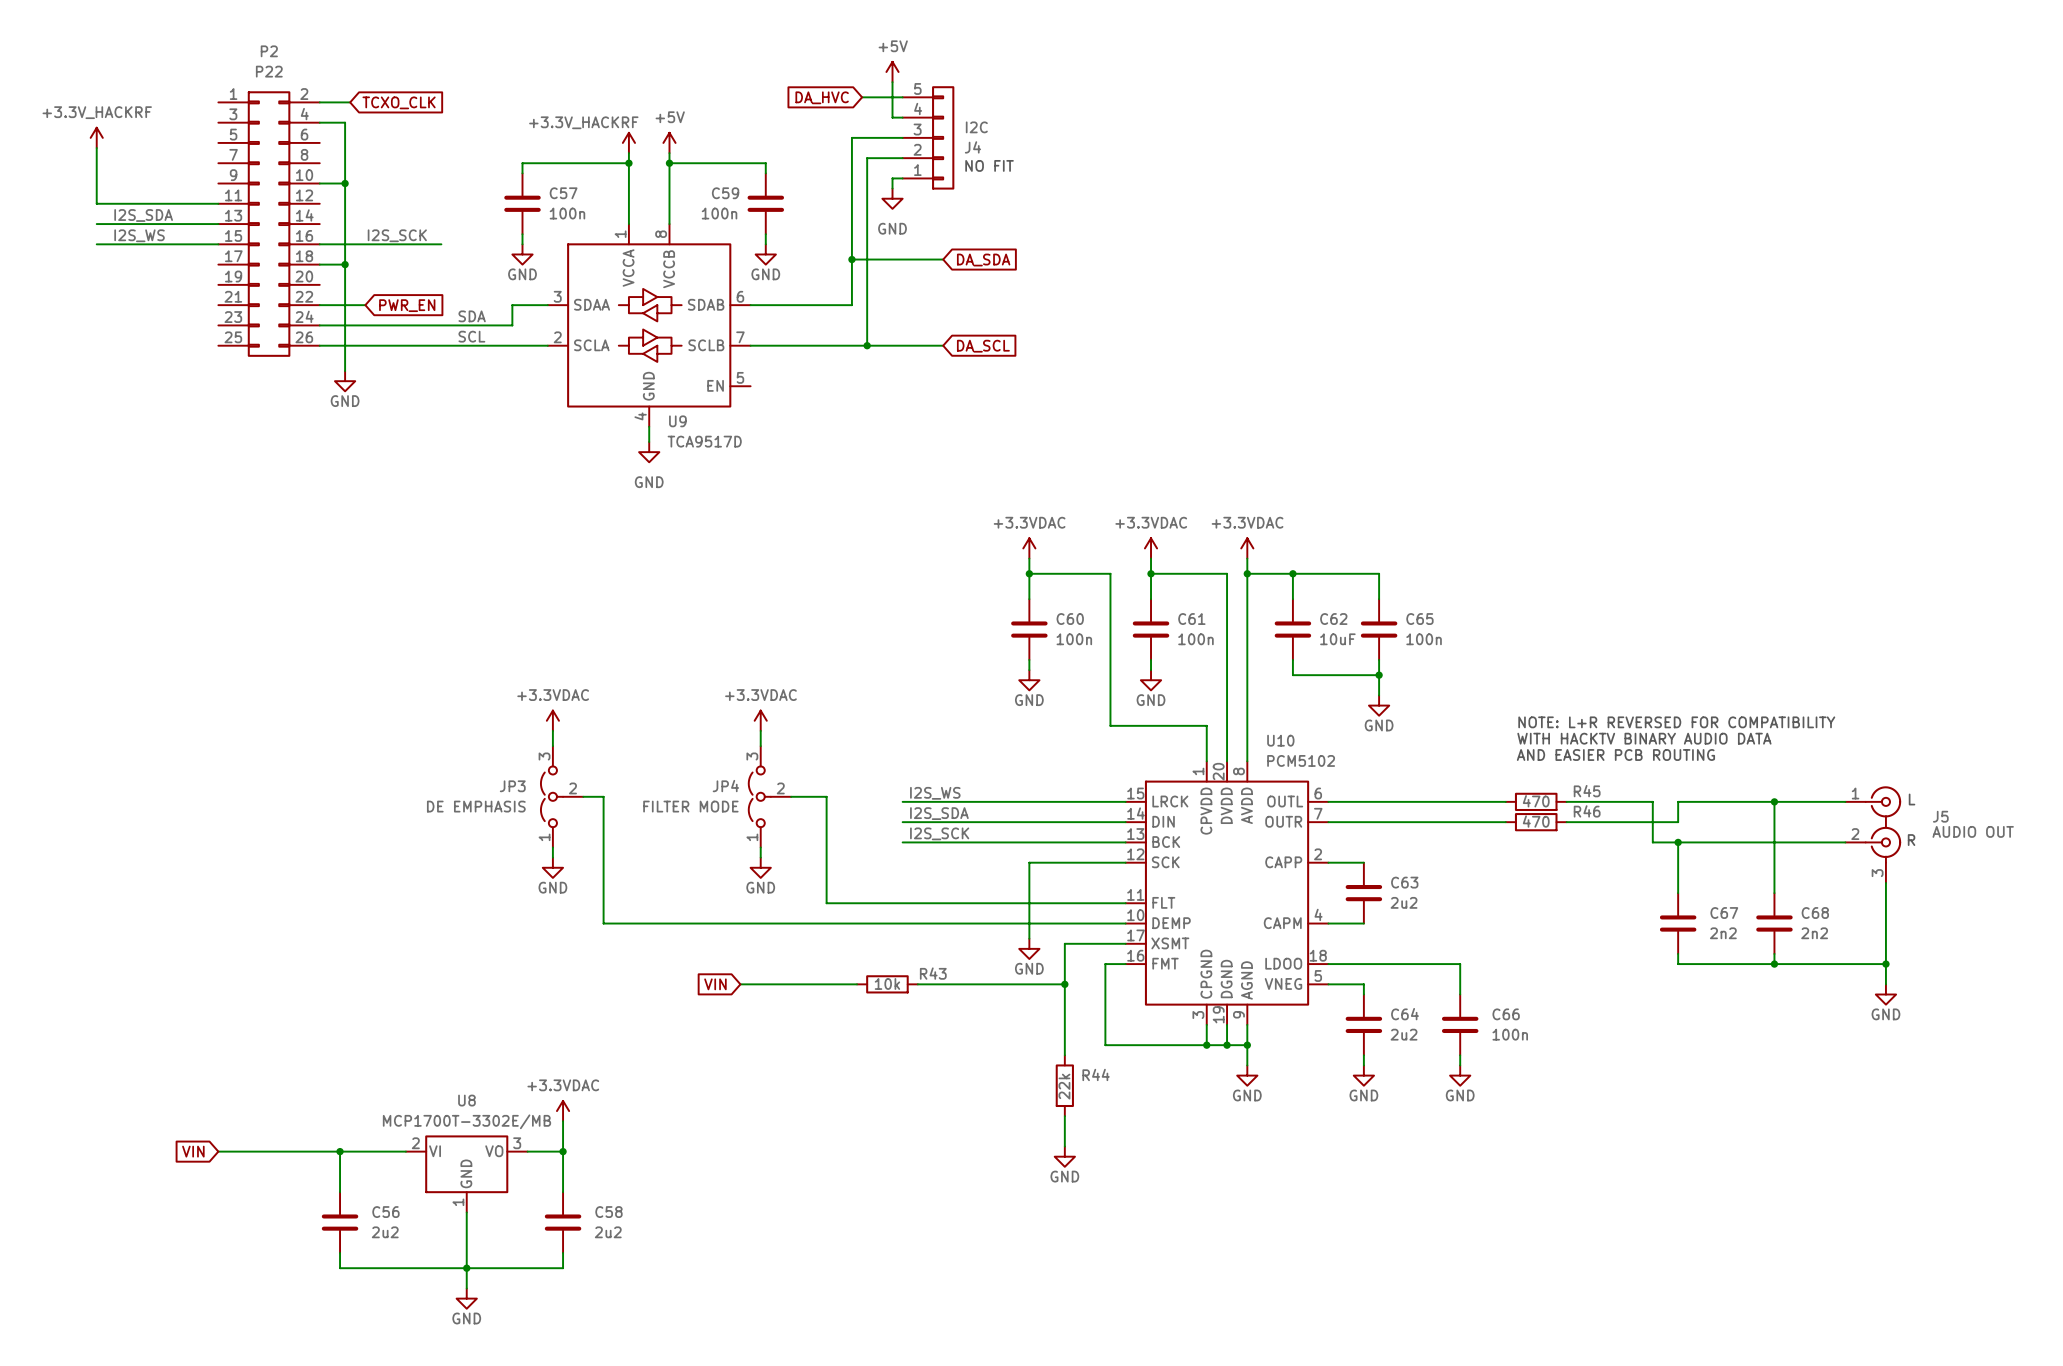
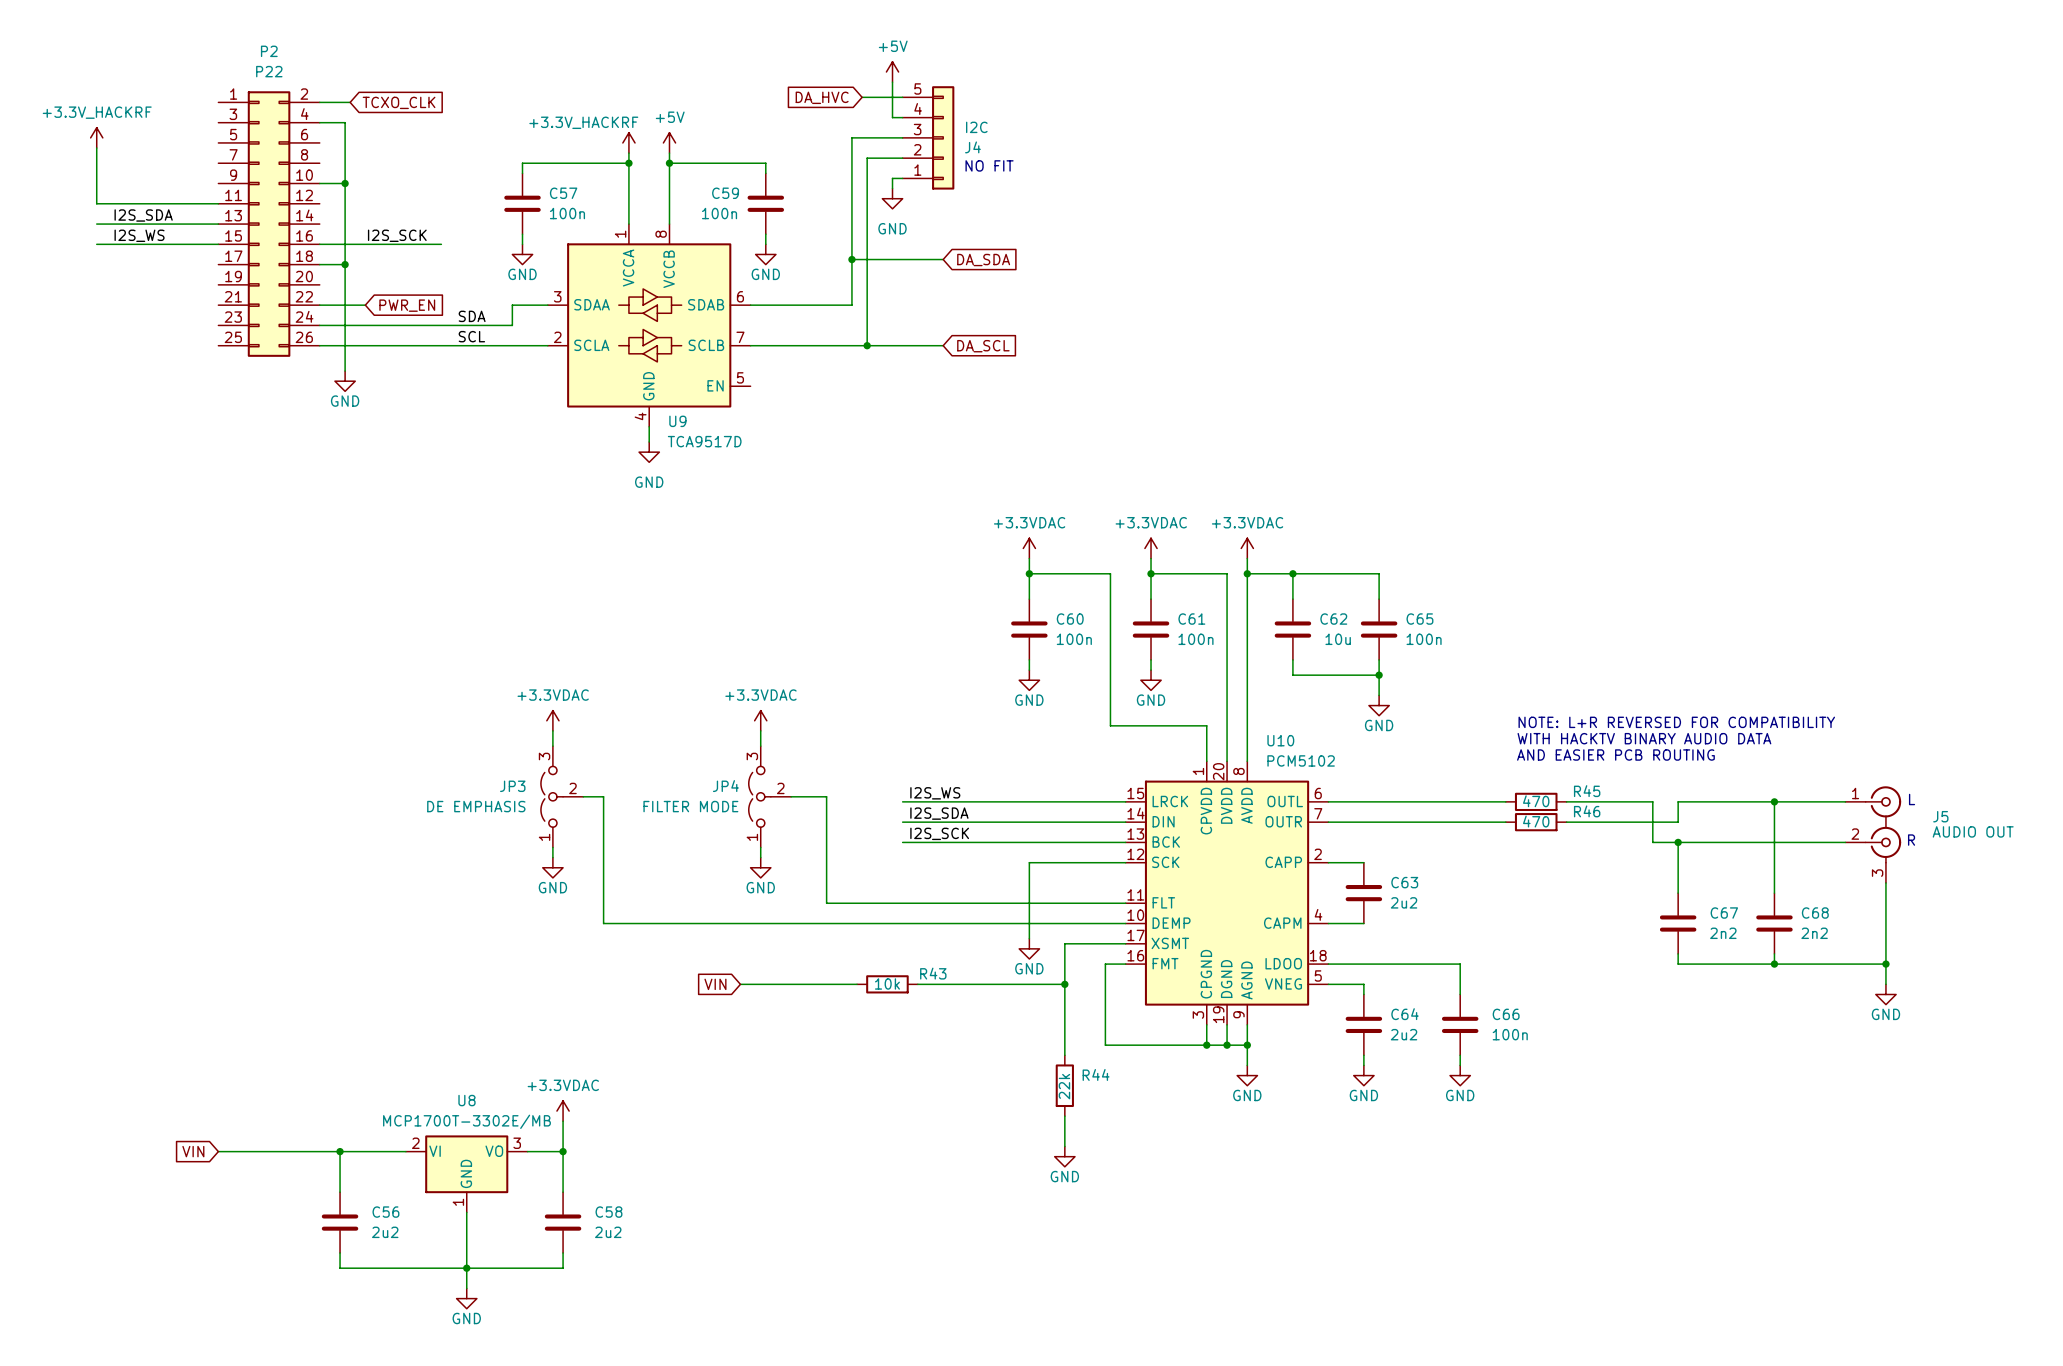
C62 value: 10uF (1337, 639) -> 10u (1338, 639)

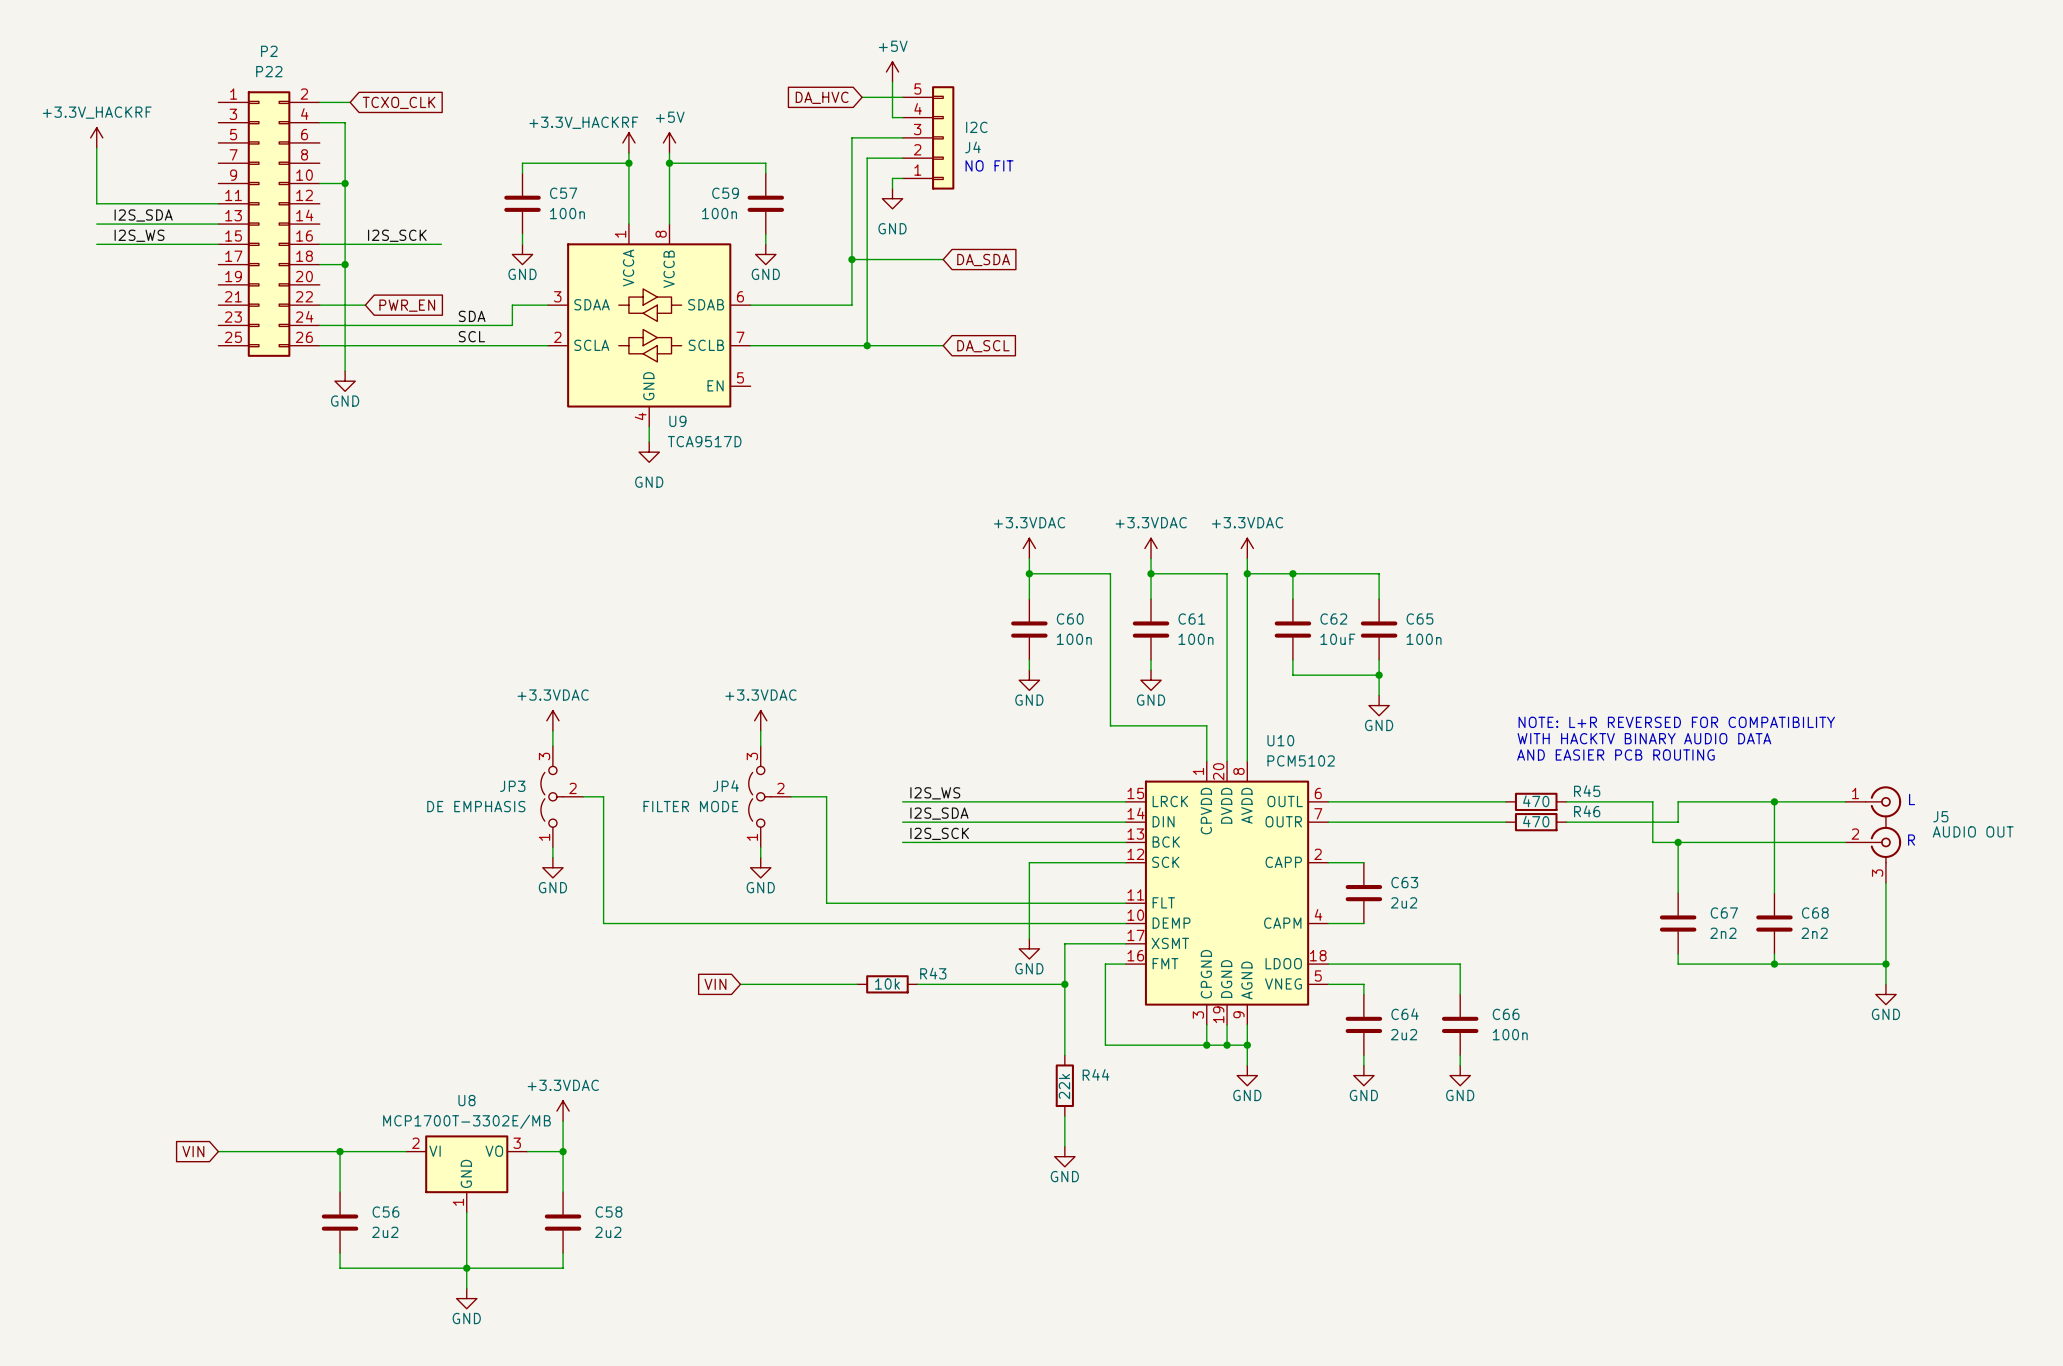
C62 value: 10u (1338, 639) -> 10uF (1337, 639)

